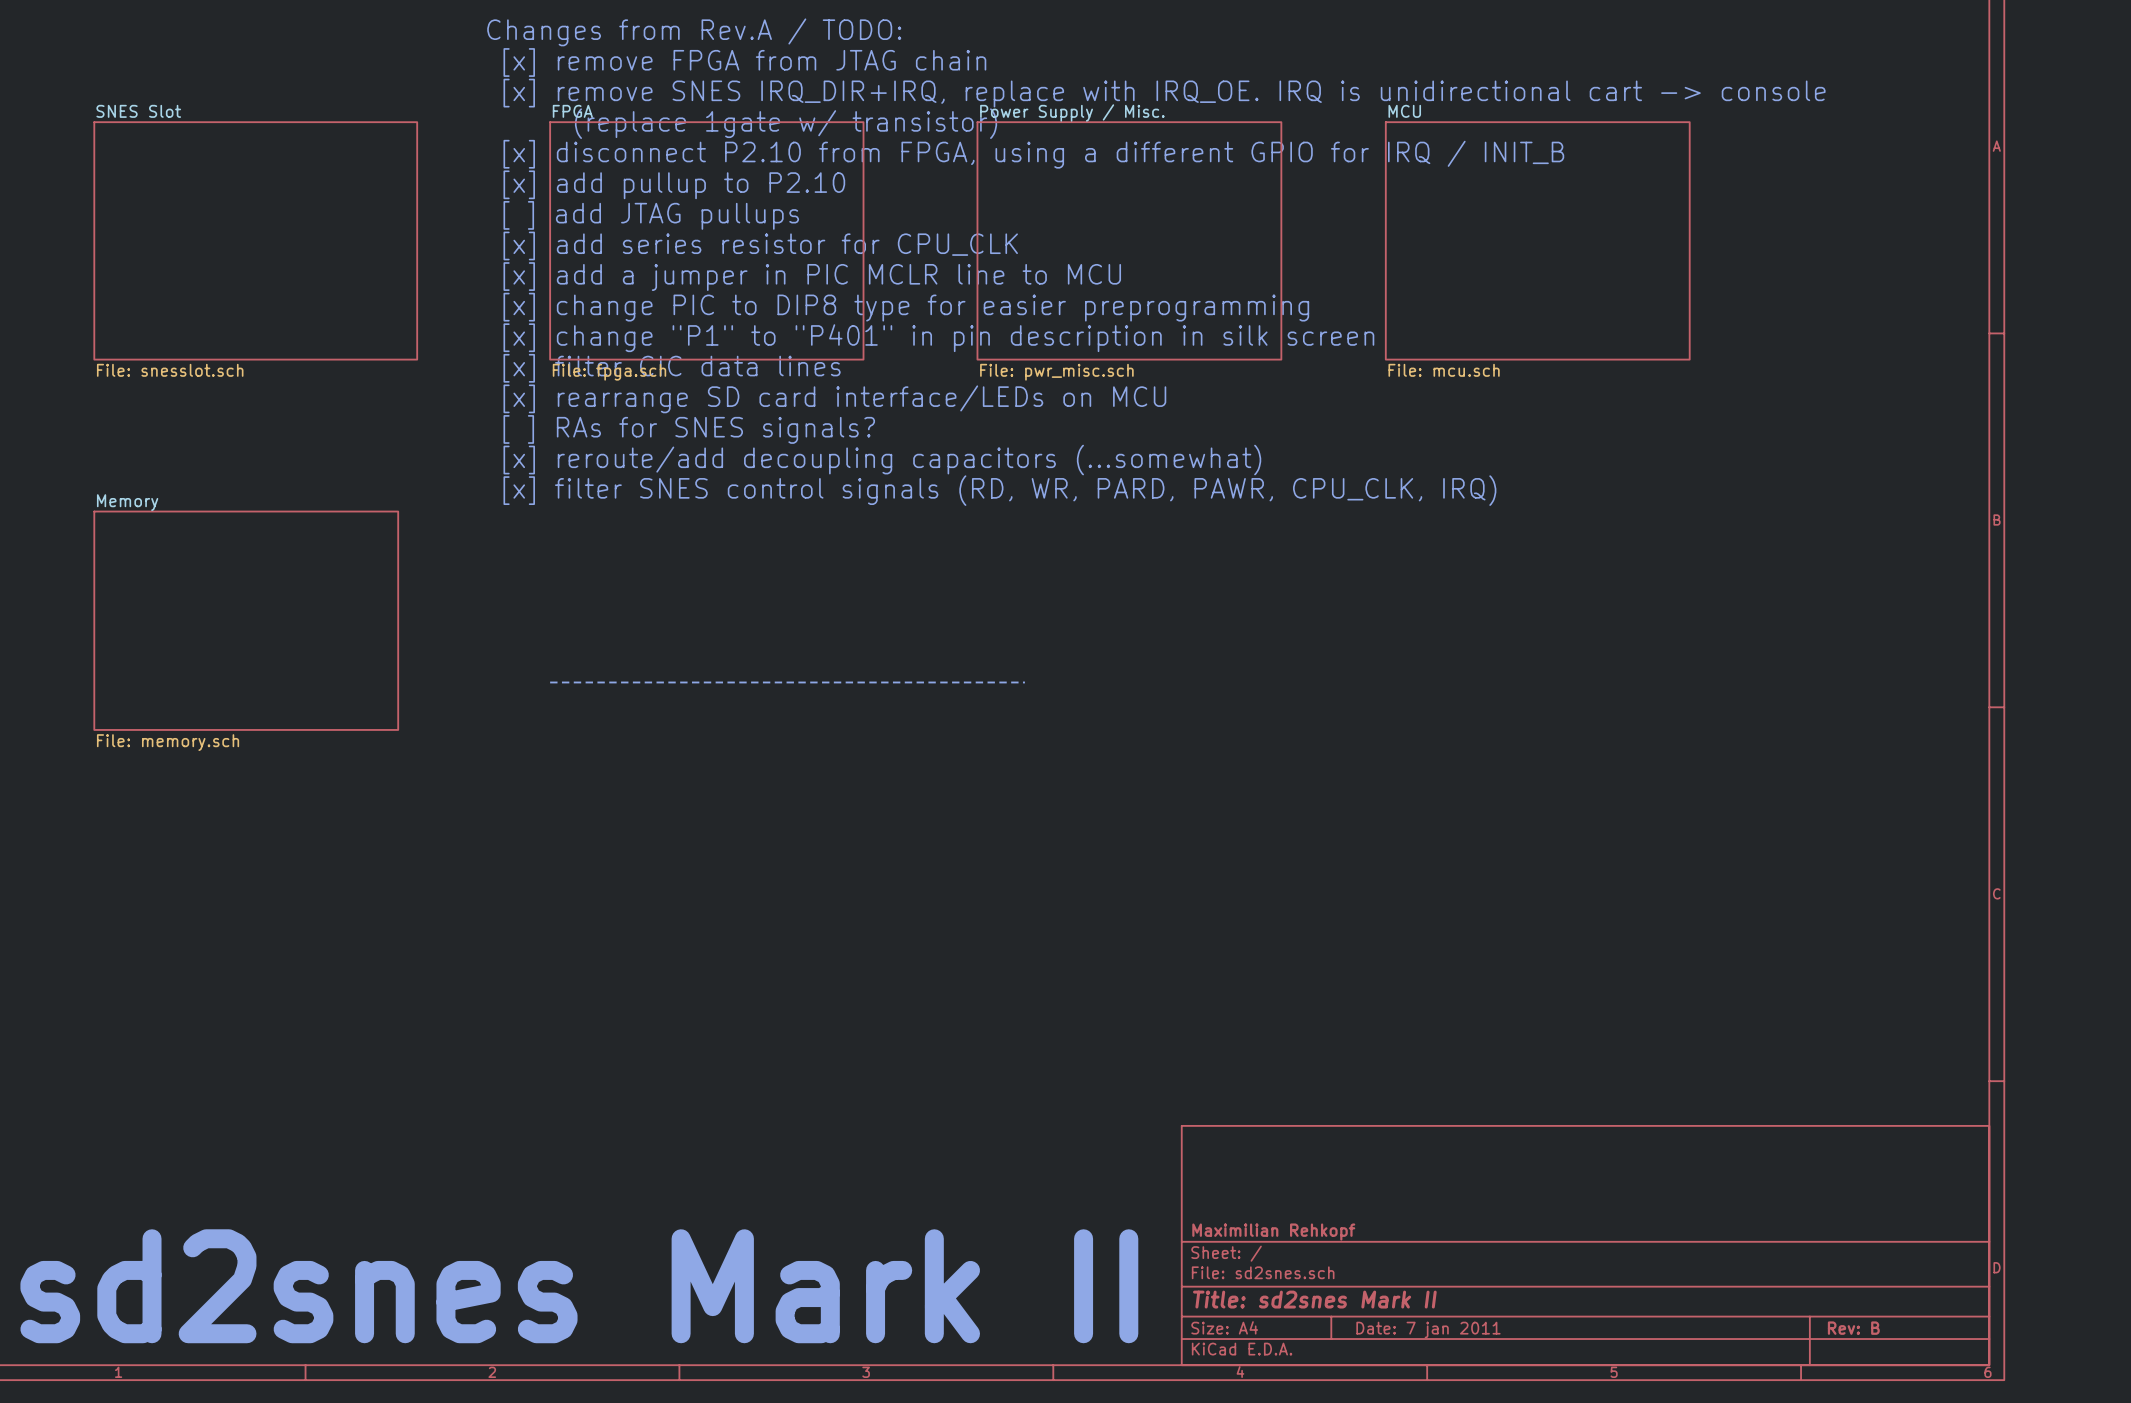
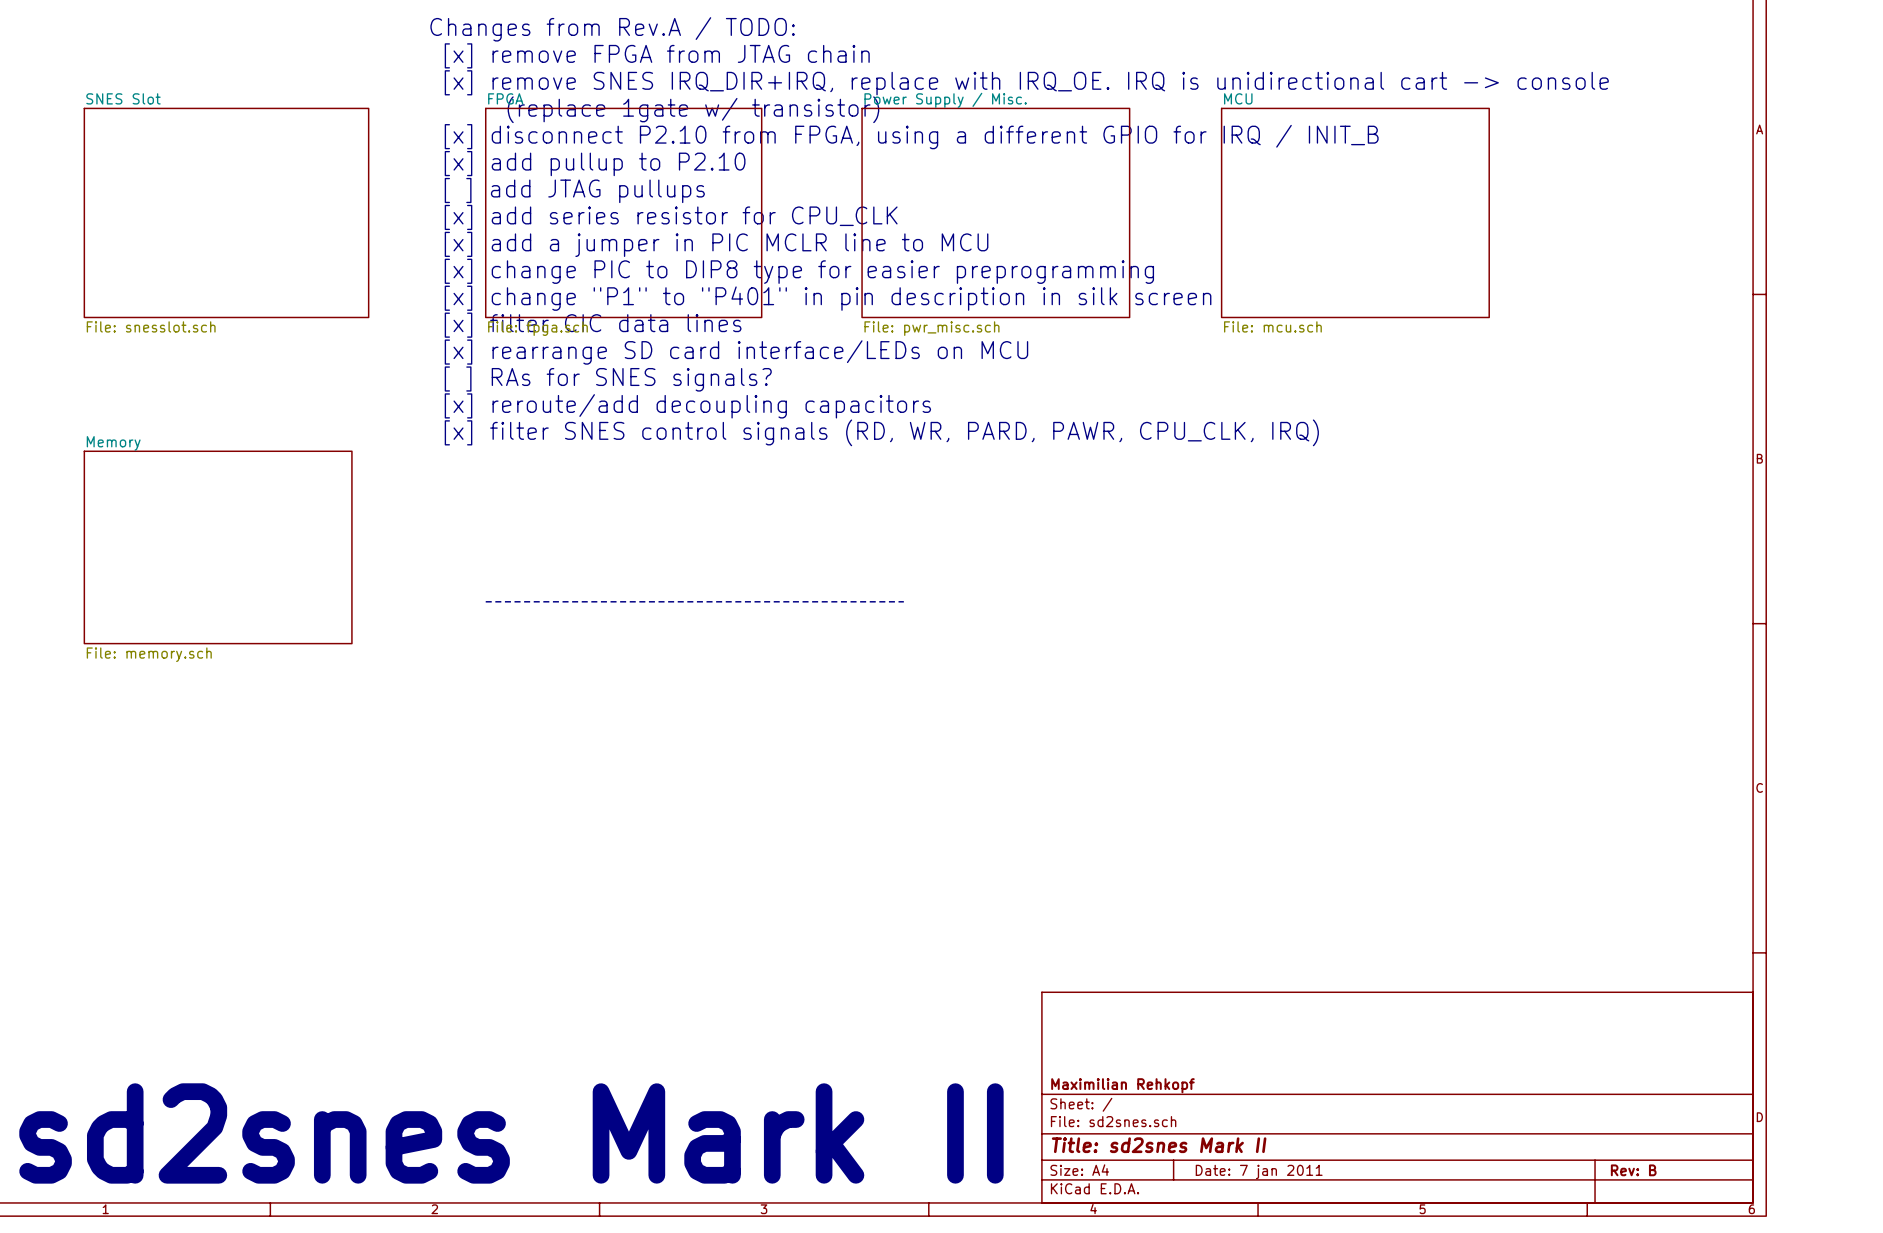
text: [x] reroute/add decoupling capacitors (...somewhat) (882, 460) -> [x] reroute/add decoupling capacitors (687, 405)

